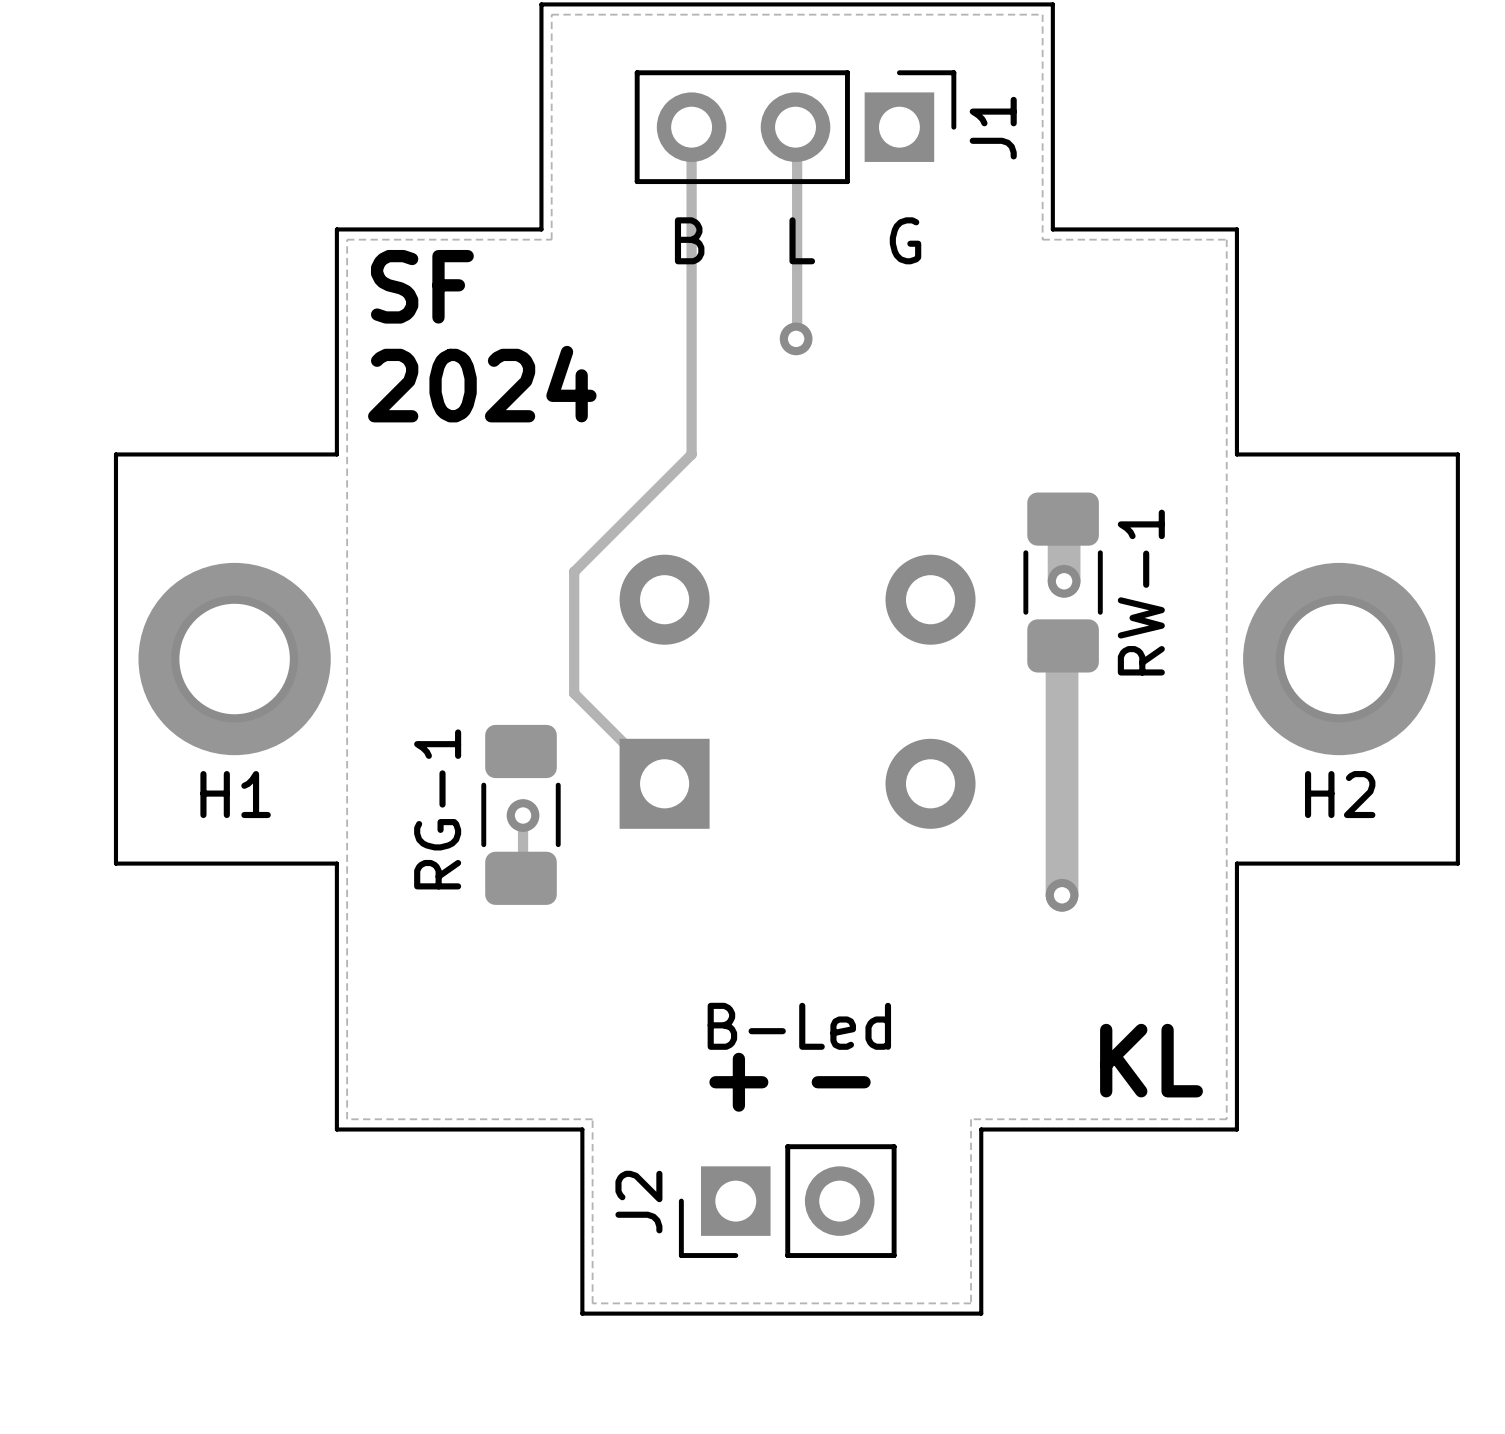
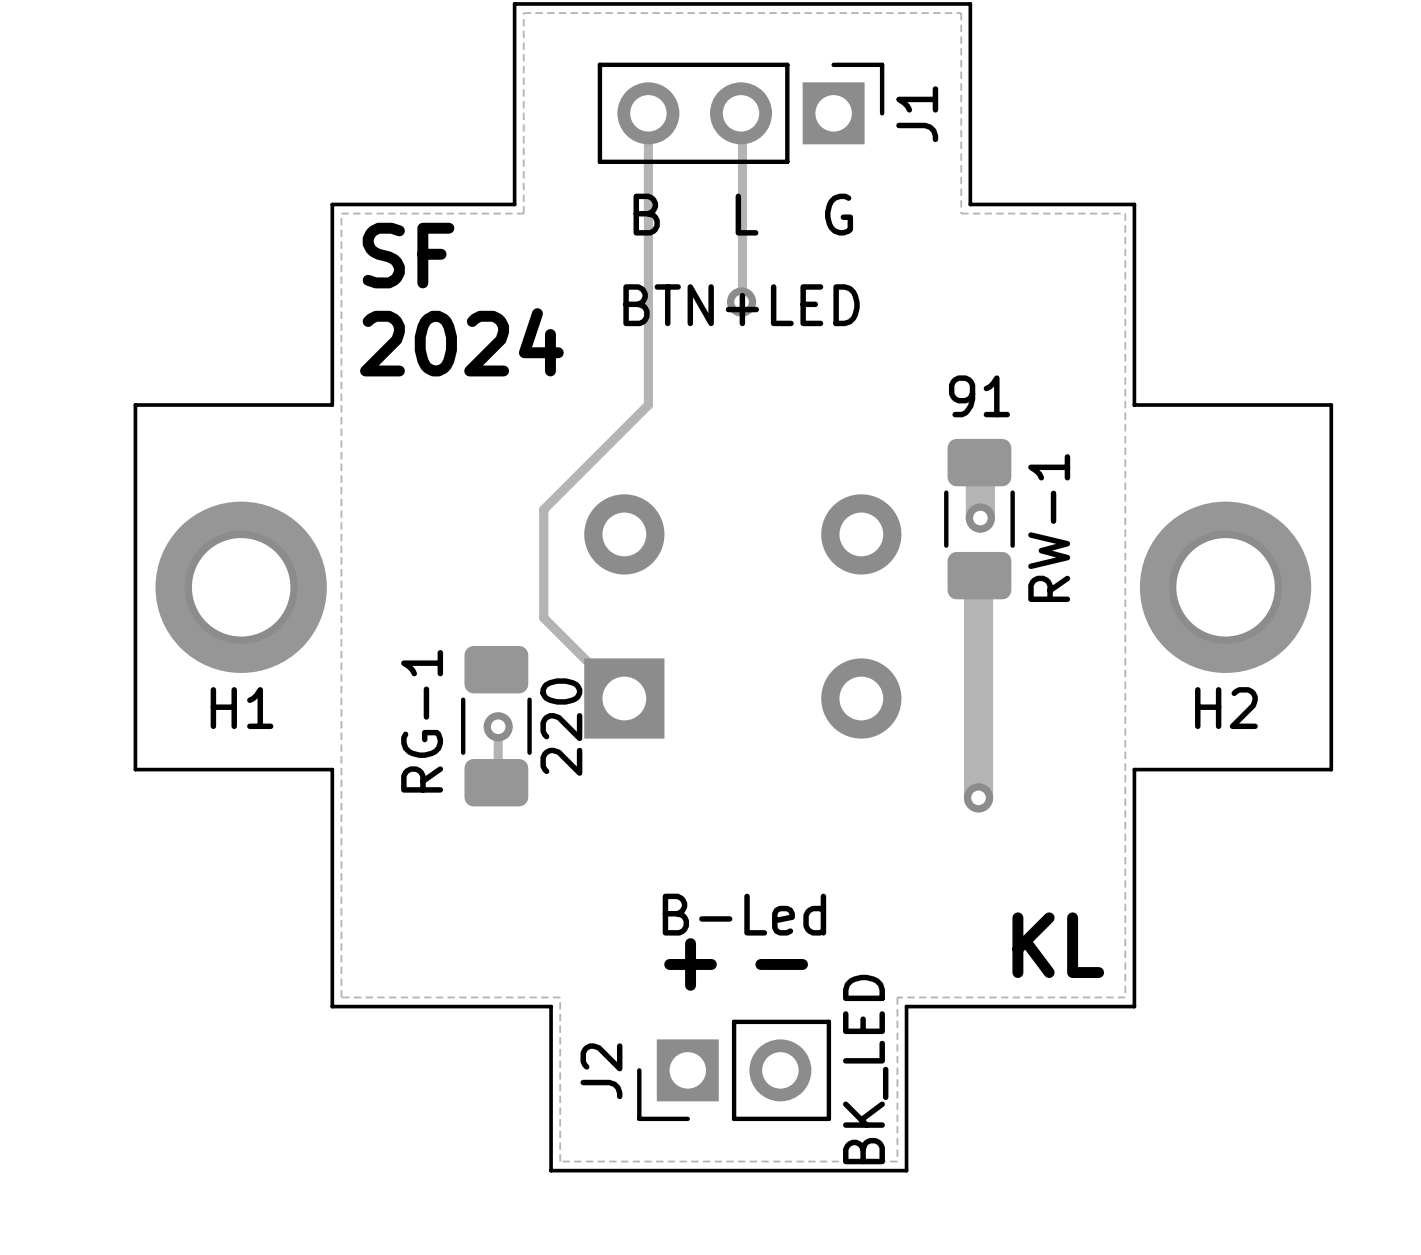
J1 value: none -> BTN+LED (741, 305)
RW-1 value: none -> 91 (979, 396)
RG-1 value: none -> 220 (561, 727)
J2 value: none -> BK_LED (865, 1069)

